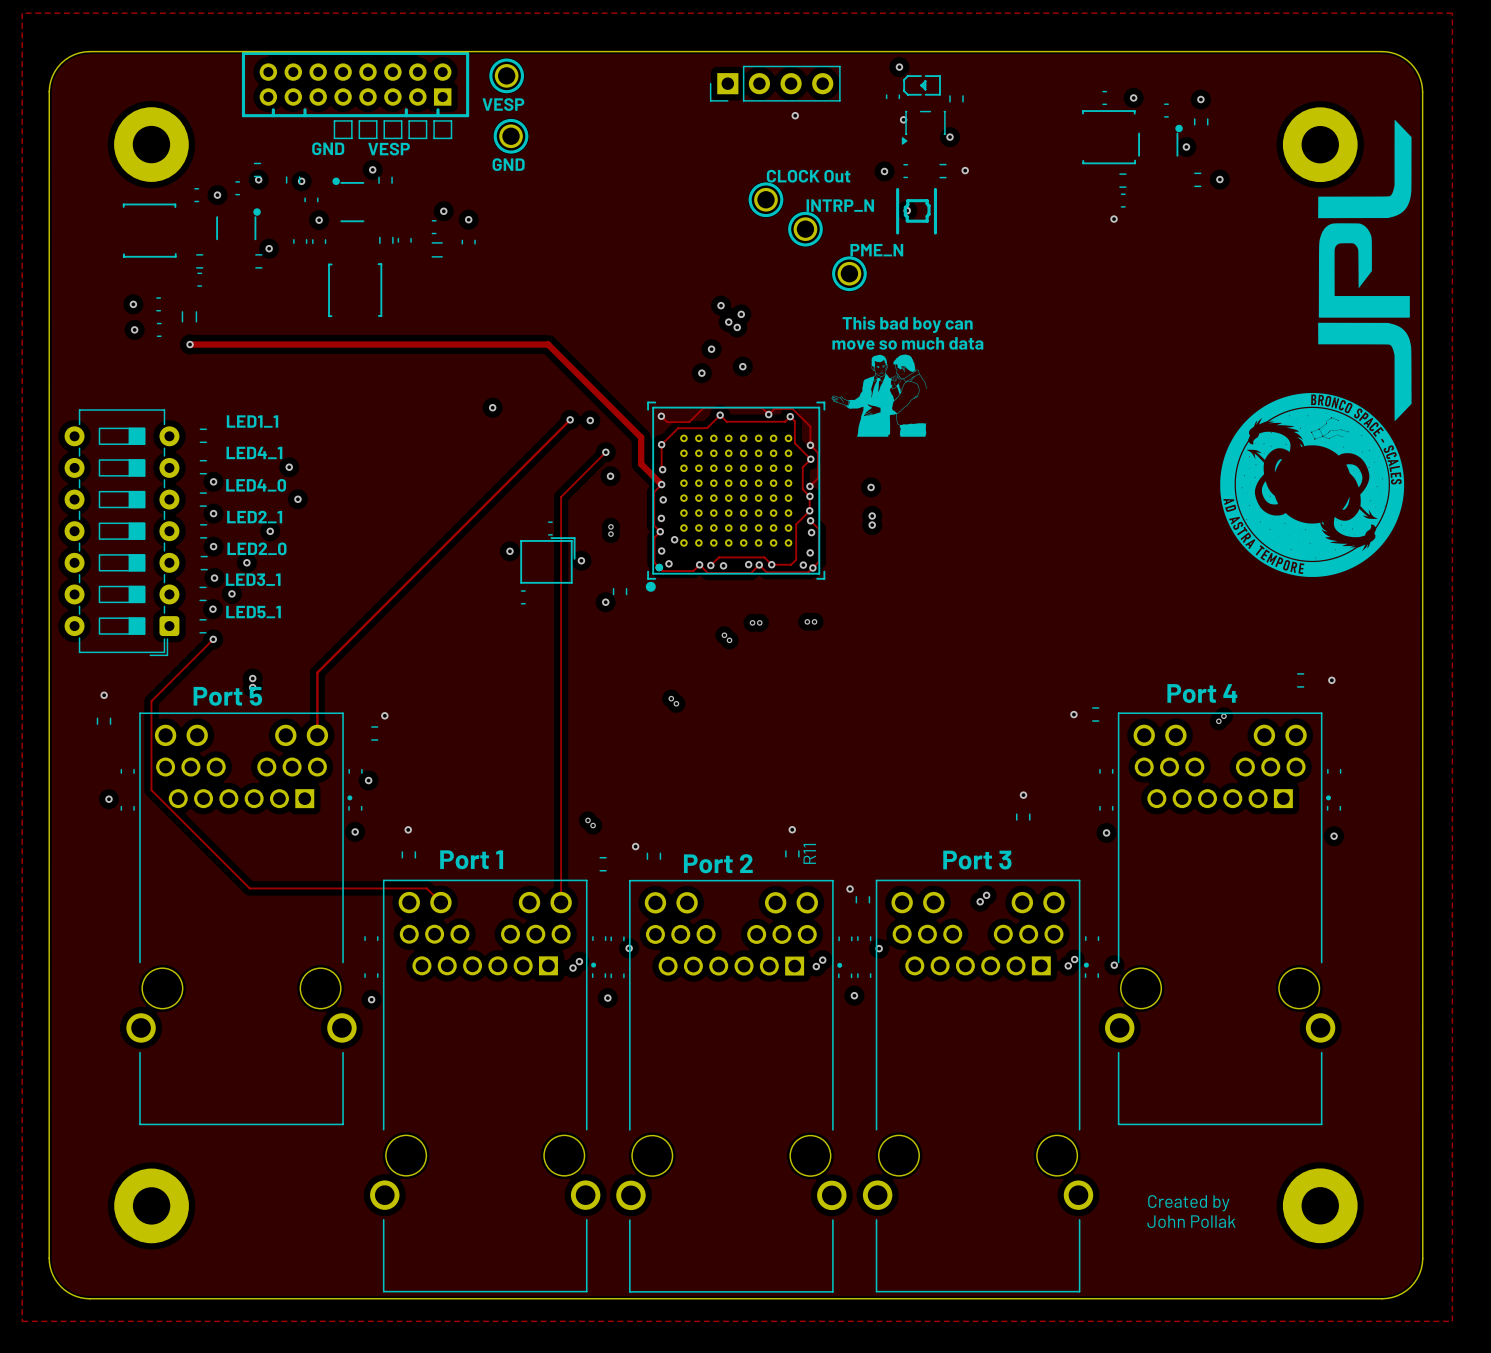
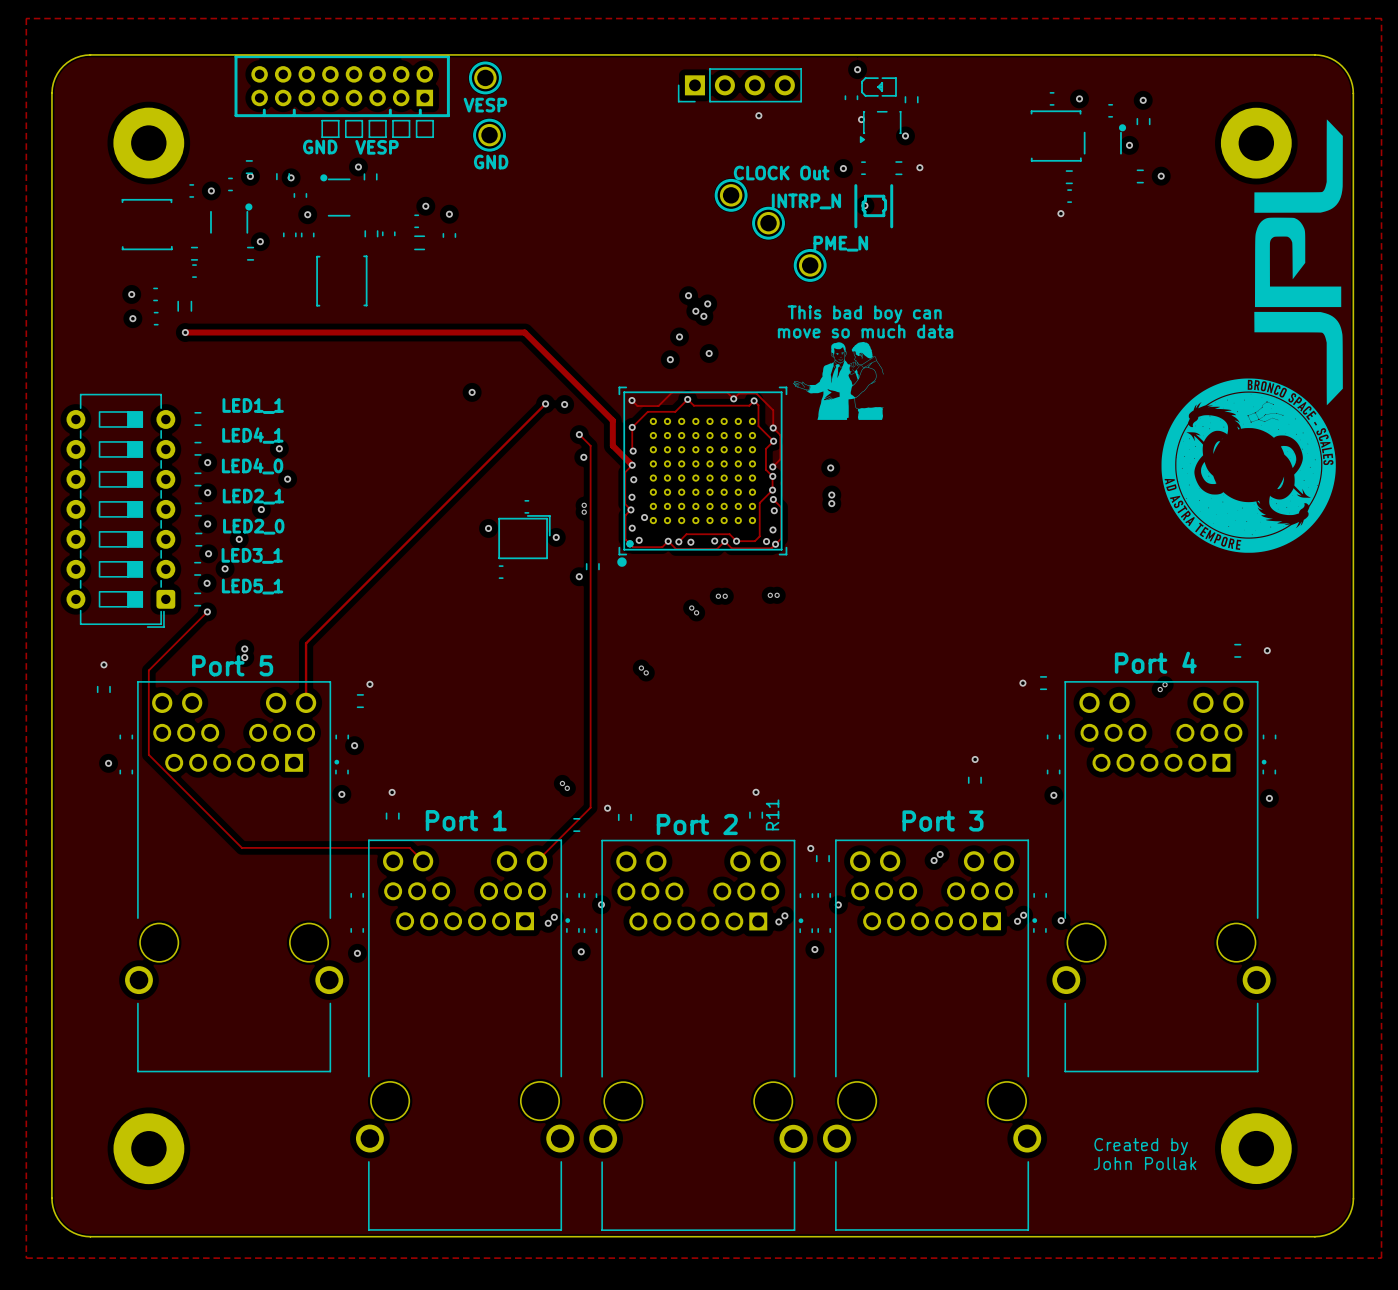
track: (605, 452) (561, 497) (561, 902) -> (579, 434) (590, 445) (590, 807) (537, 861)

